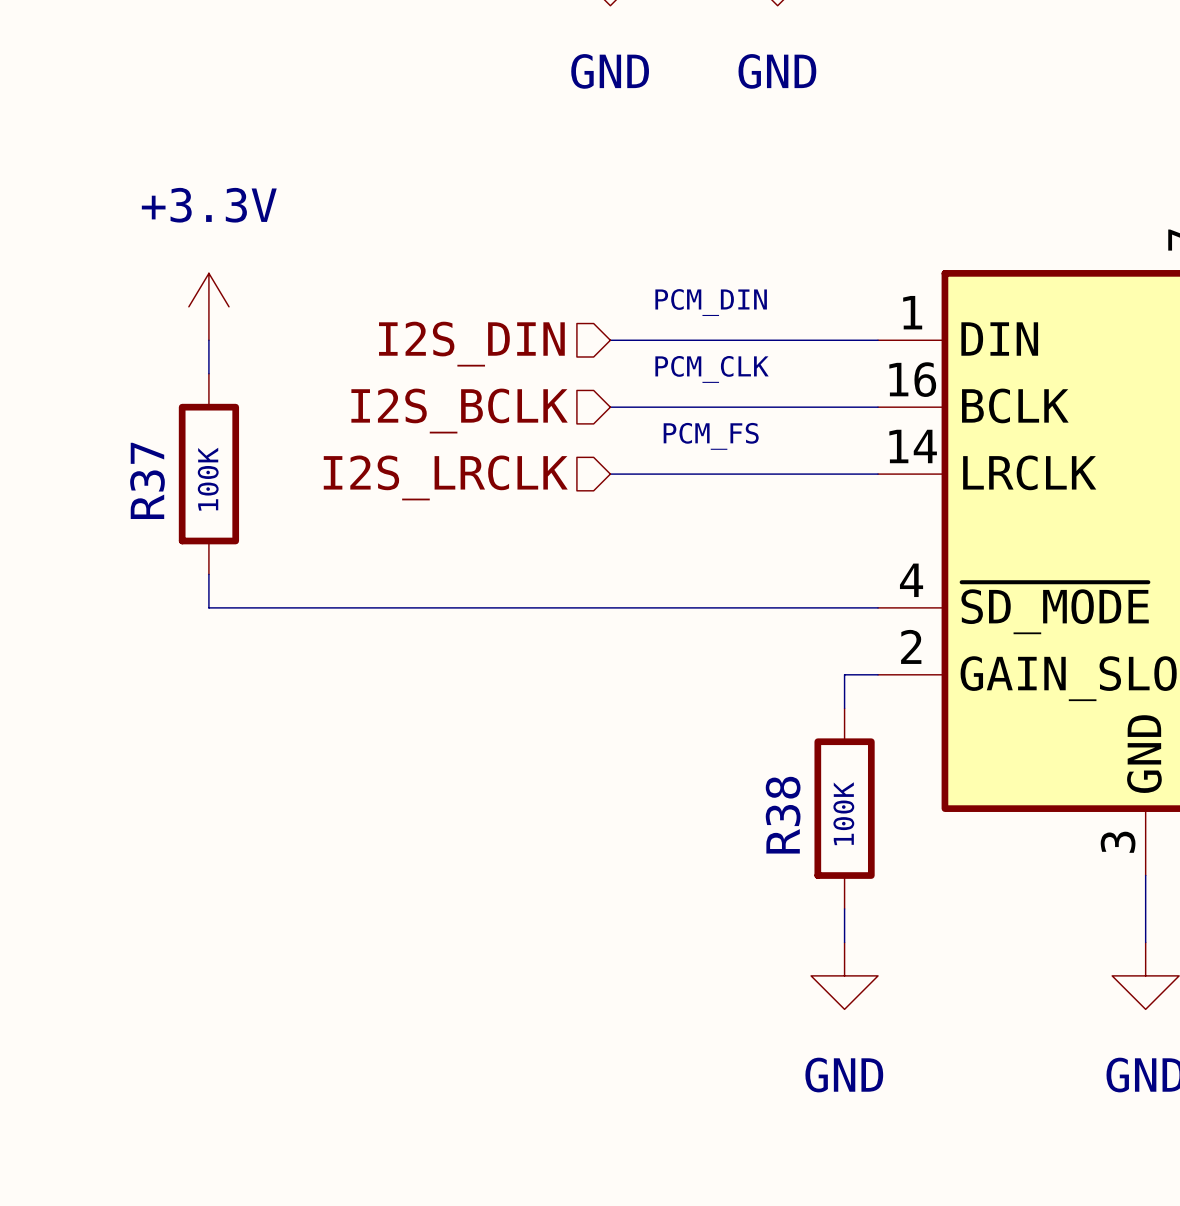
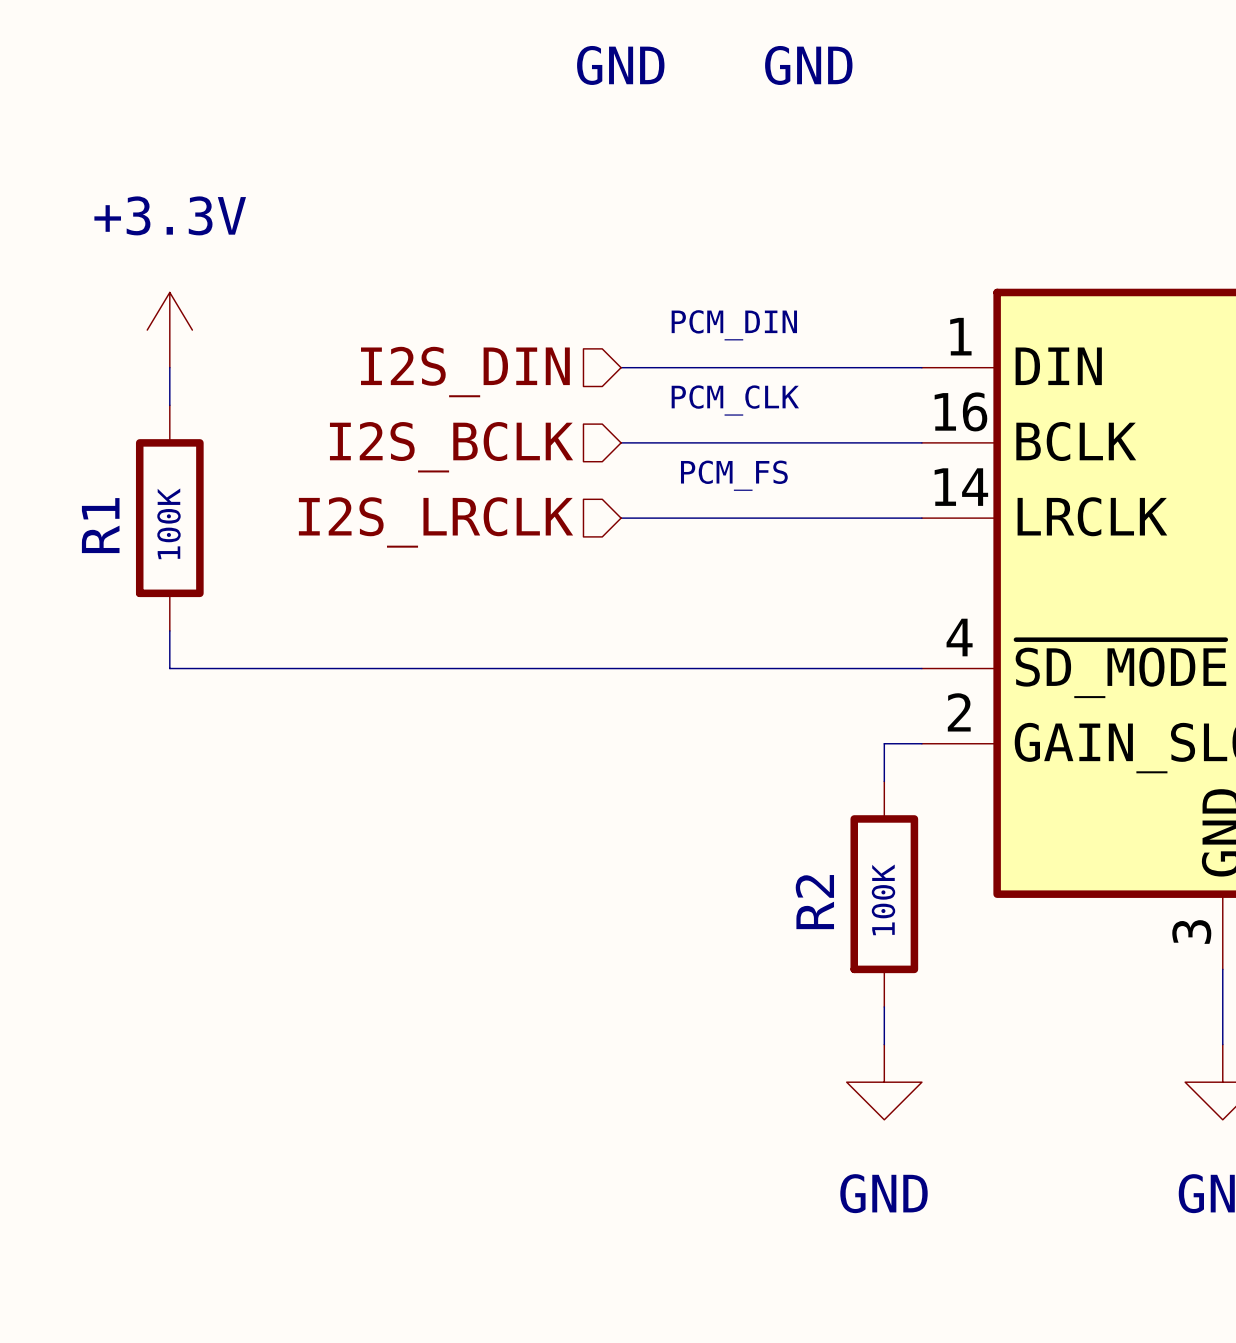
R37 name: R37 (147, 480) -> R1 (100, 525)
R38 name: R38 (783, 815) -> R2 (814, 902)

